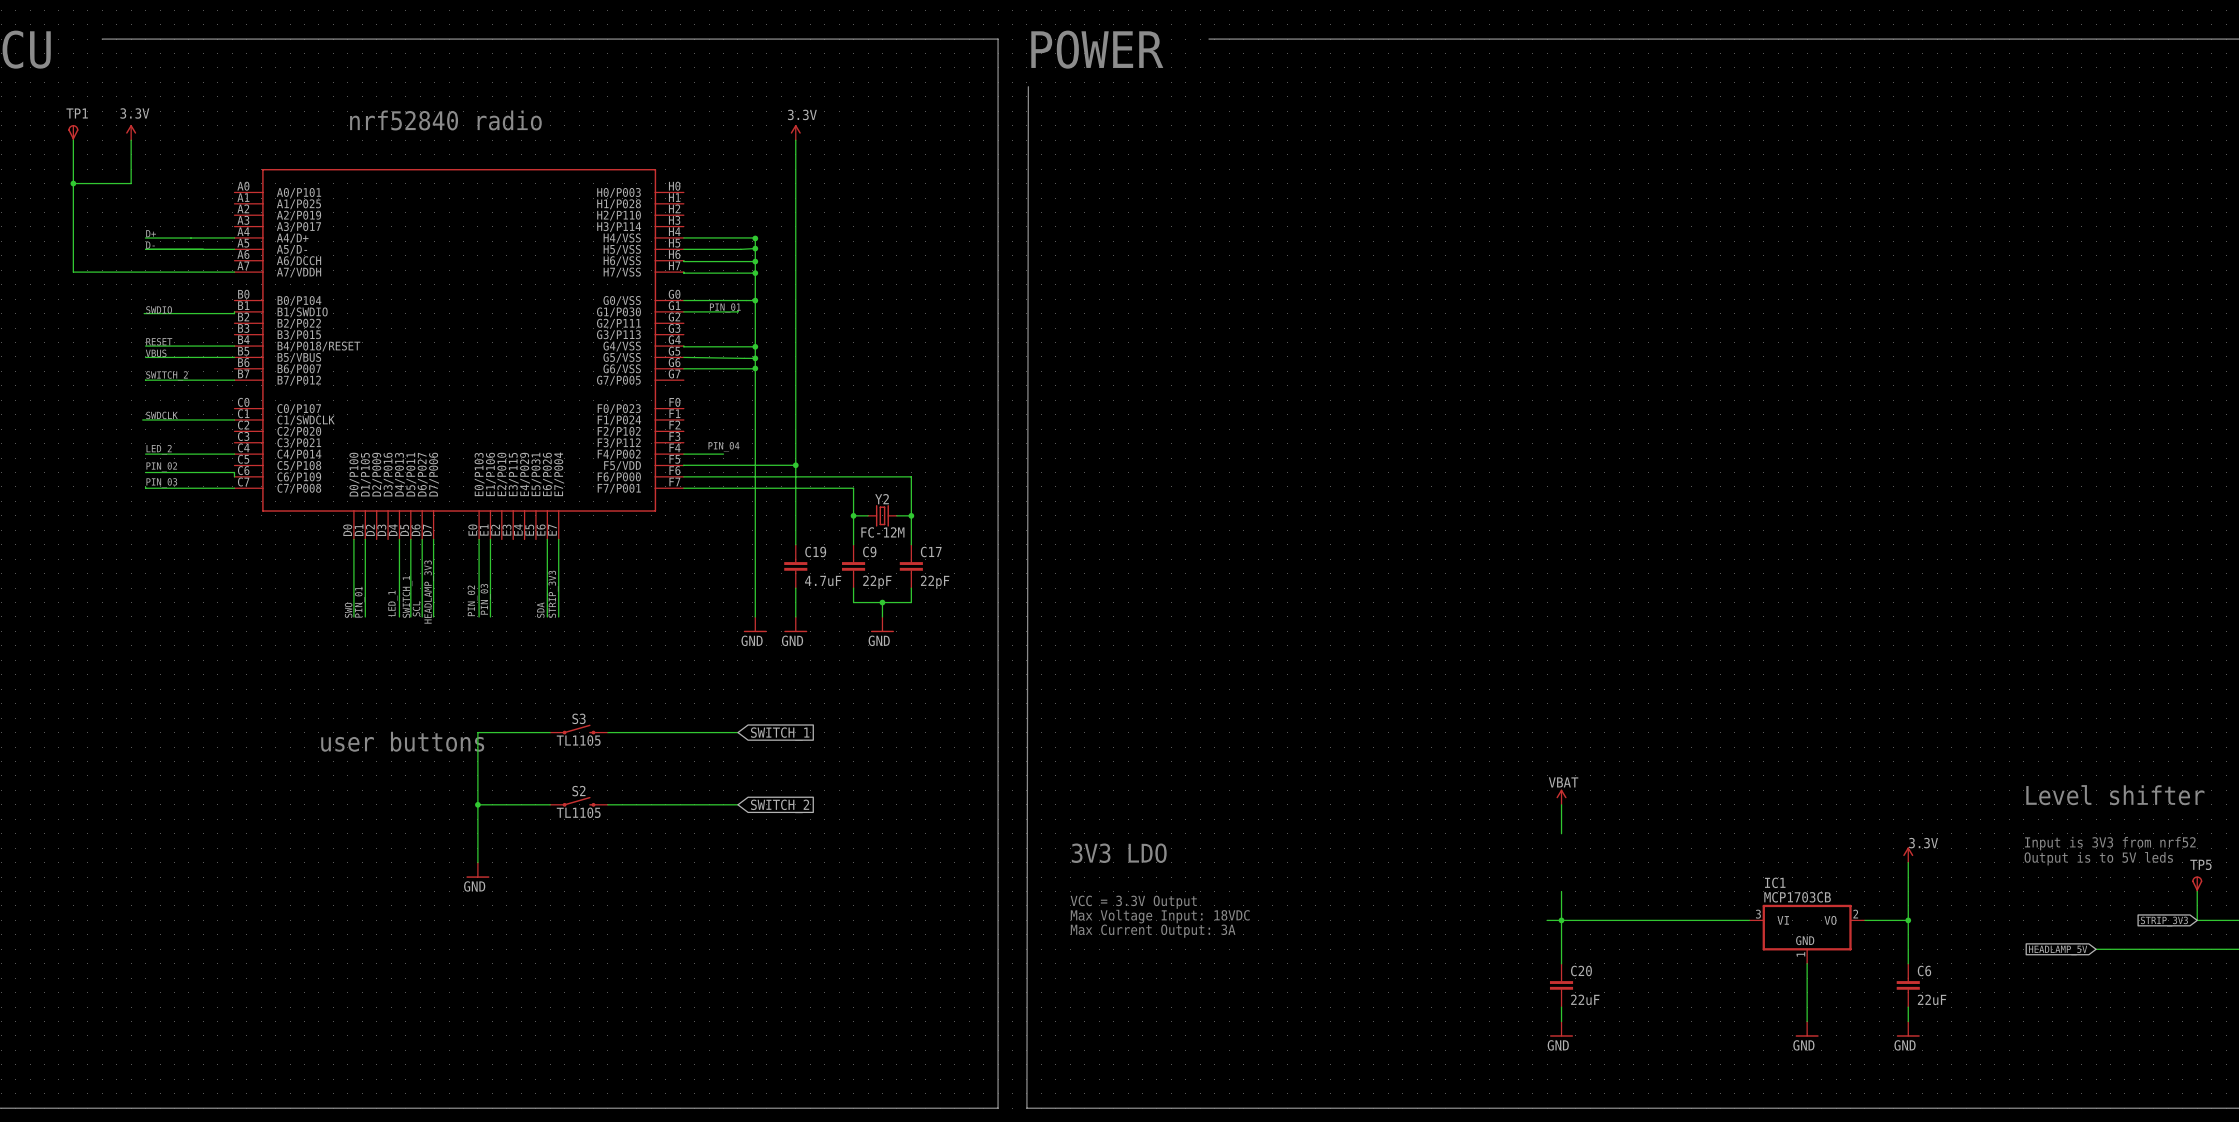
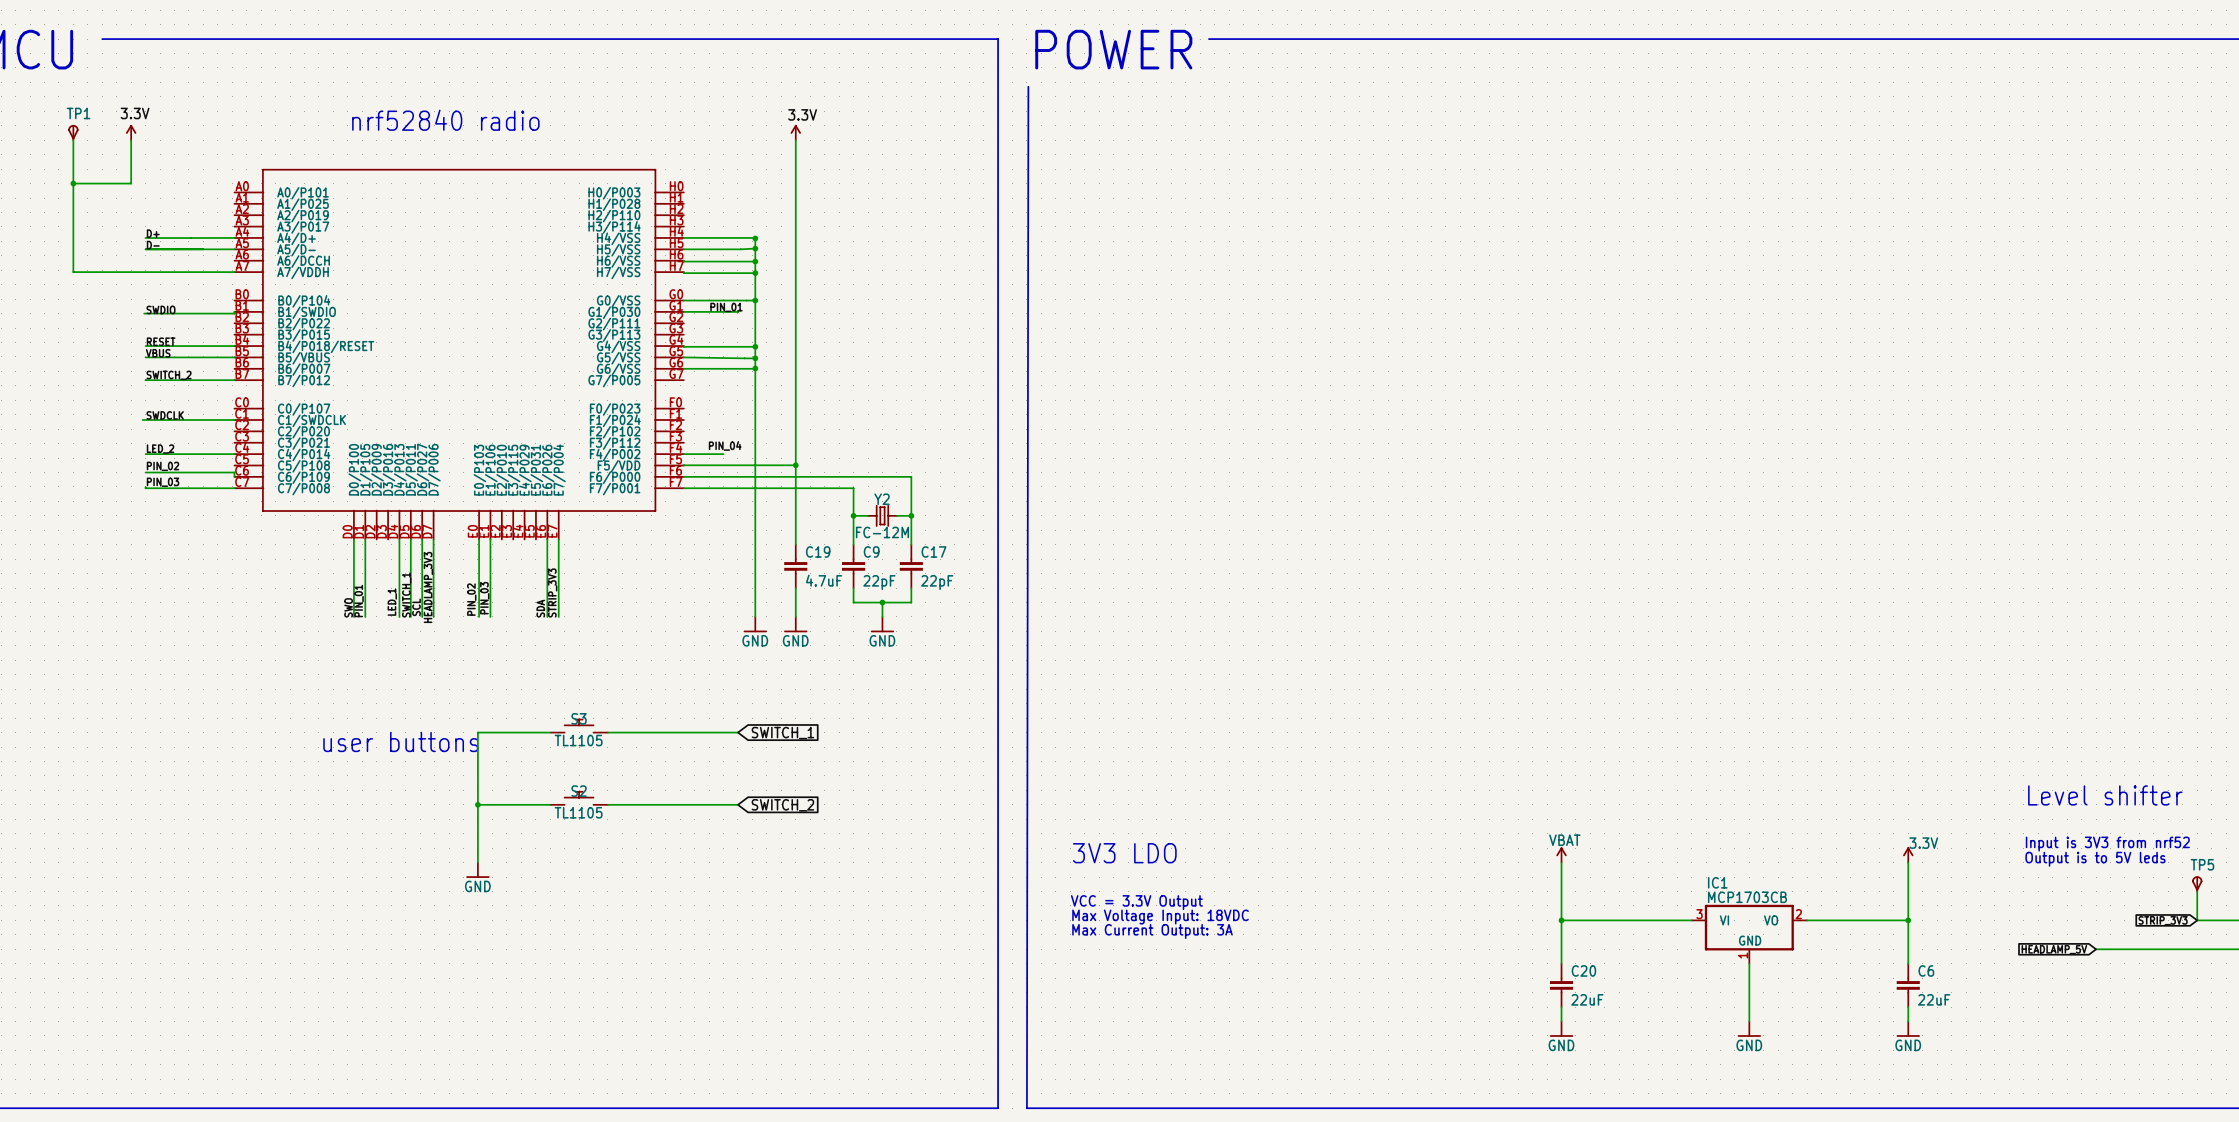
S3 symbol: [550, 724, 608, 735] -> [550, 718, 608, 733]
S2 symbol: [550, 796, 608, 807] -> [550, 791, 608, 805]
power symbol position: VBAT (1561, 797) -> VBAT (1561, 855)
wire: (1561, 804) (1561, 833) -> (1561, 862) (1561, 891)
wire: (1547, 920) (1561, 920) -> none
wire: (1691, 920) (1749, 920) -> (1807, 920) (1864, 920)
IC1 position: (1807, 934) -> (1749, 934)
wire: (1807, 963) (1807, 1021) -> (1749, 963) (1749, 1021)
power symbol position: GND (1807, 1029) -> GND (1749, 1029)

